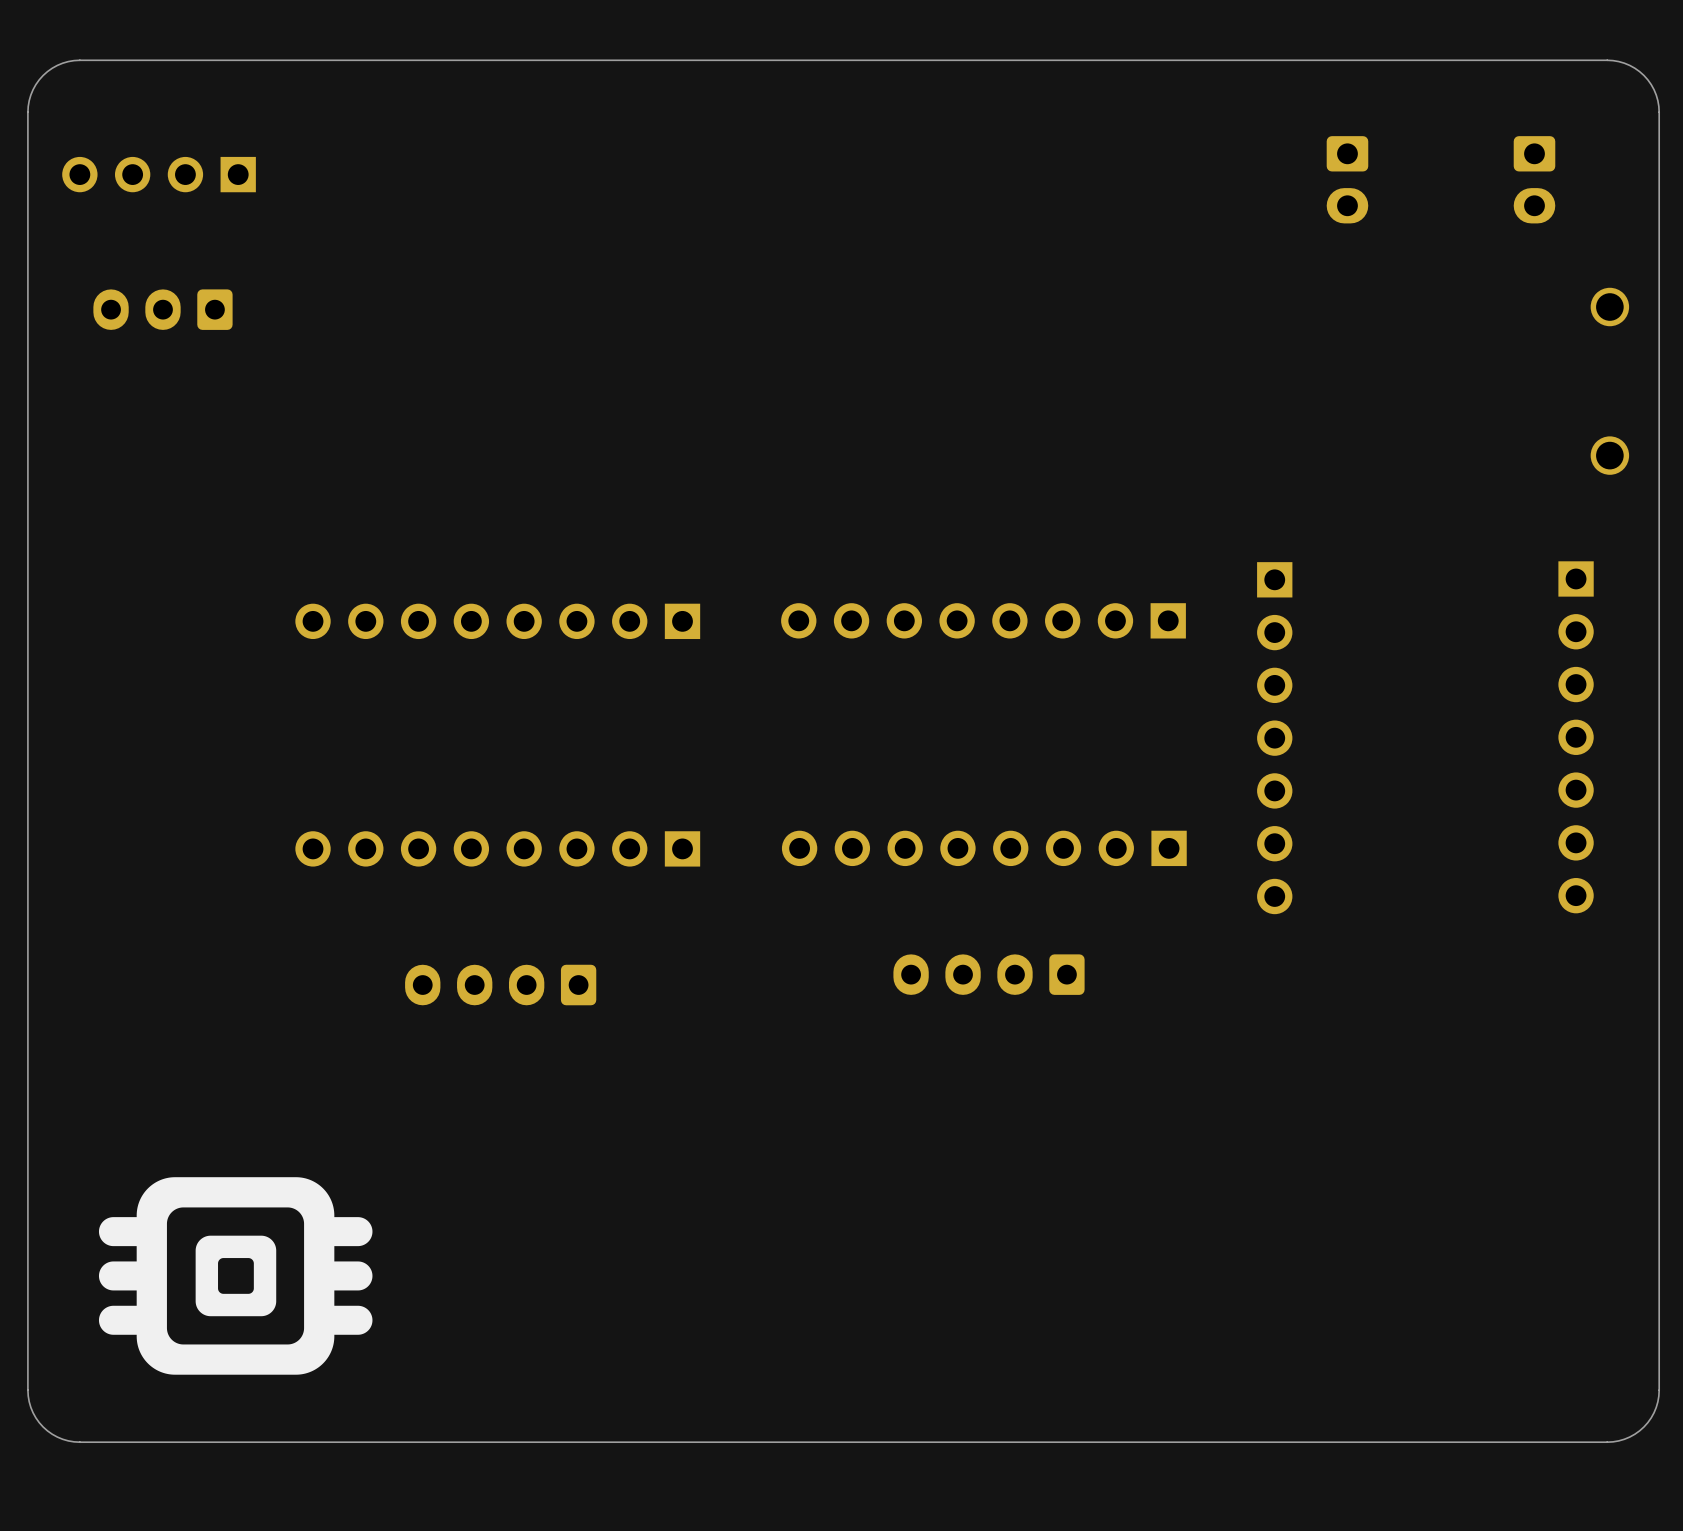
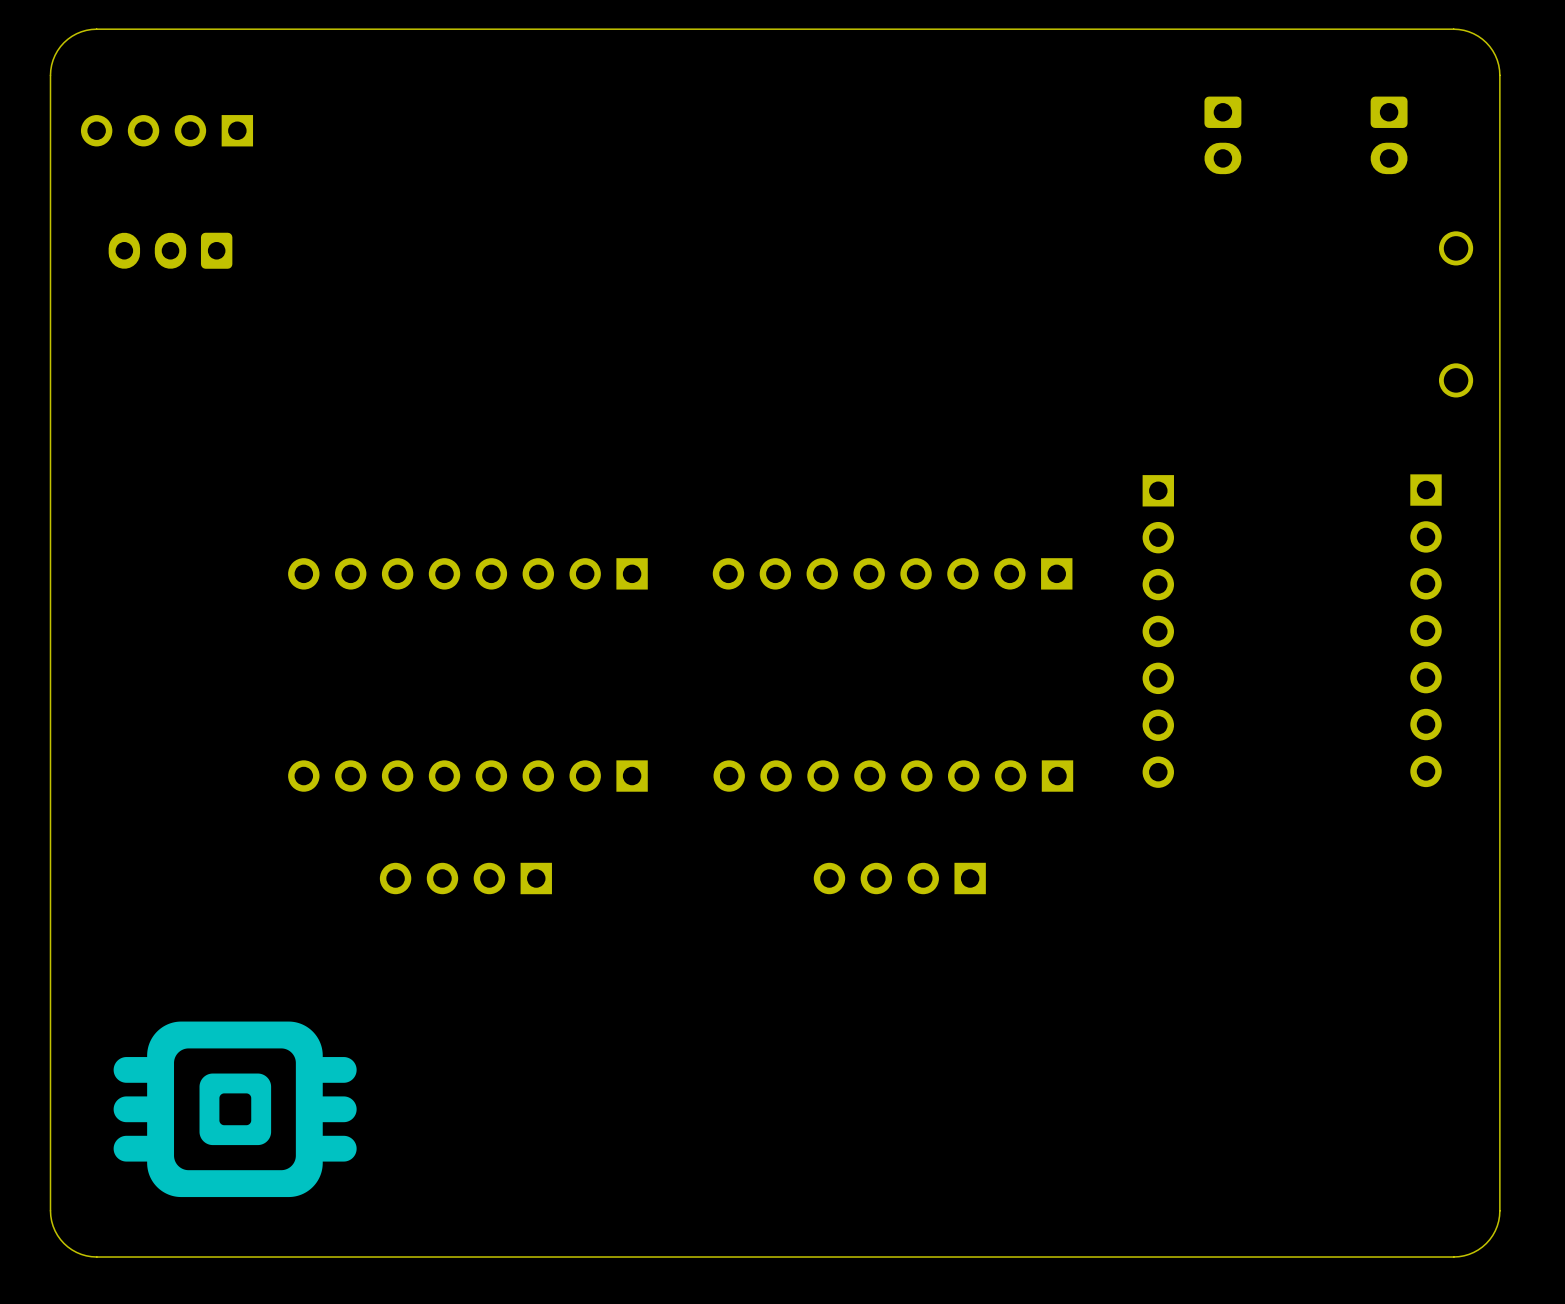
part position: (983, 620) -> (892, 573)
part position: (497, 621) -> (467, 573)
part position: (497, 848) -> (467, 776)
part position: (984, 848) -> (893, 776)
part: (989, 974) -> none
part: (500, 985) -> none
part: none -> (465, 878)
part: none -> (899, 878)

